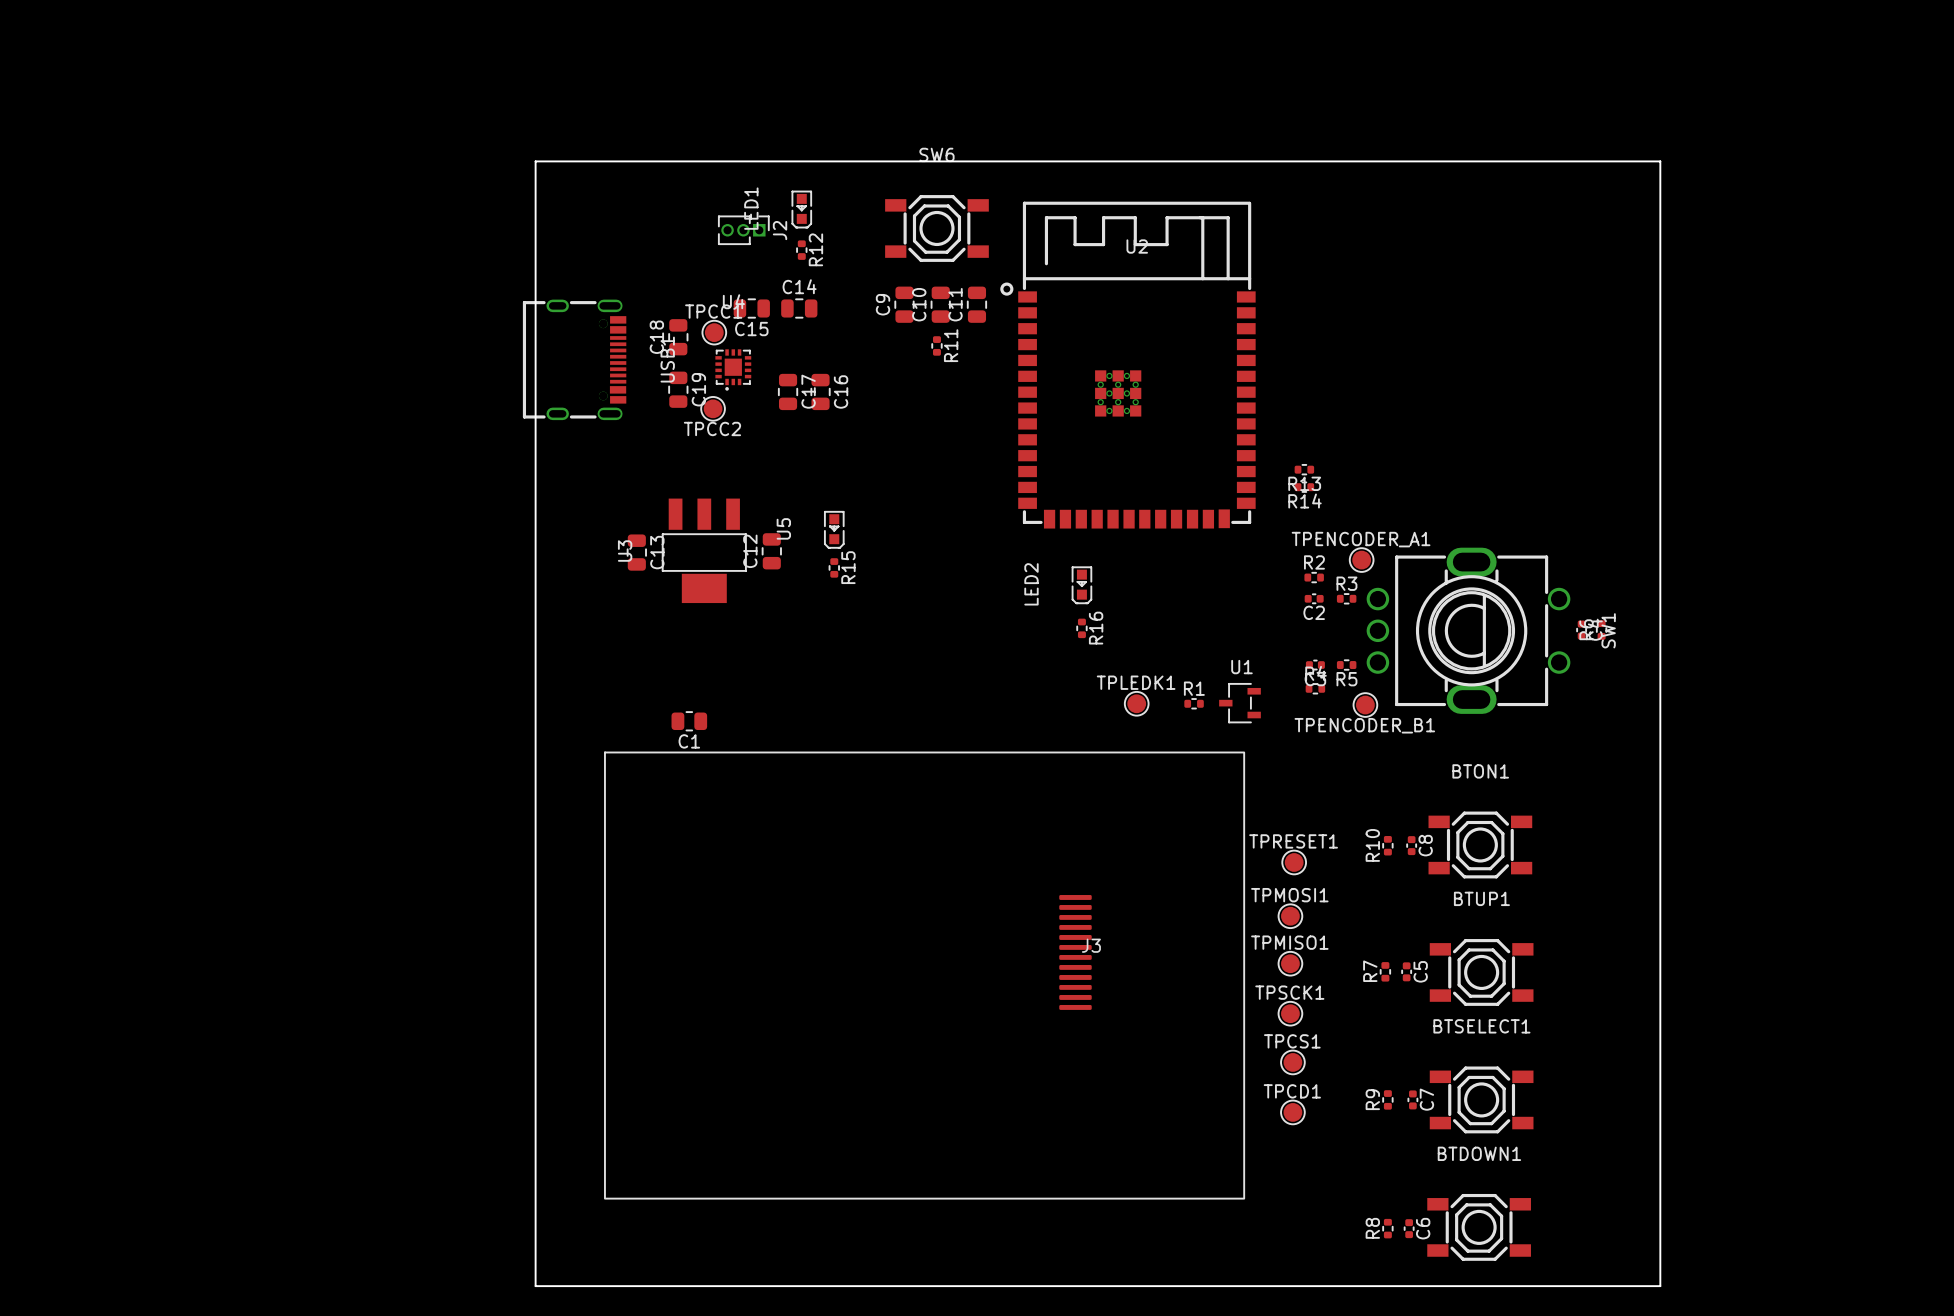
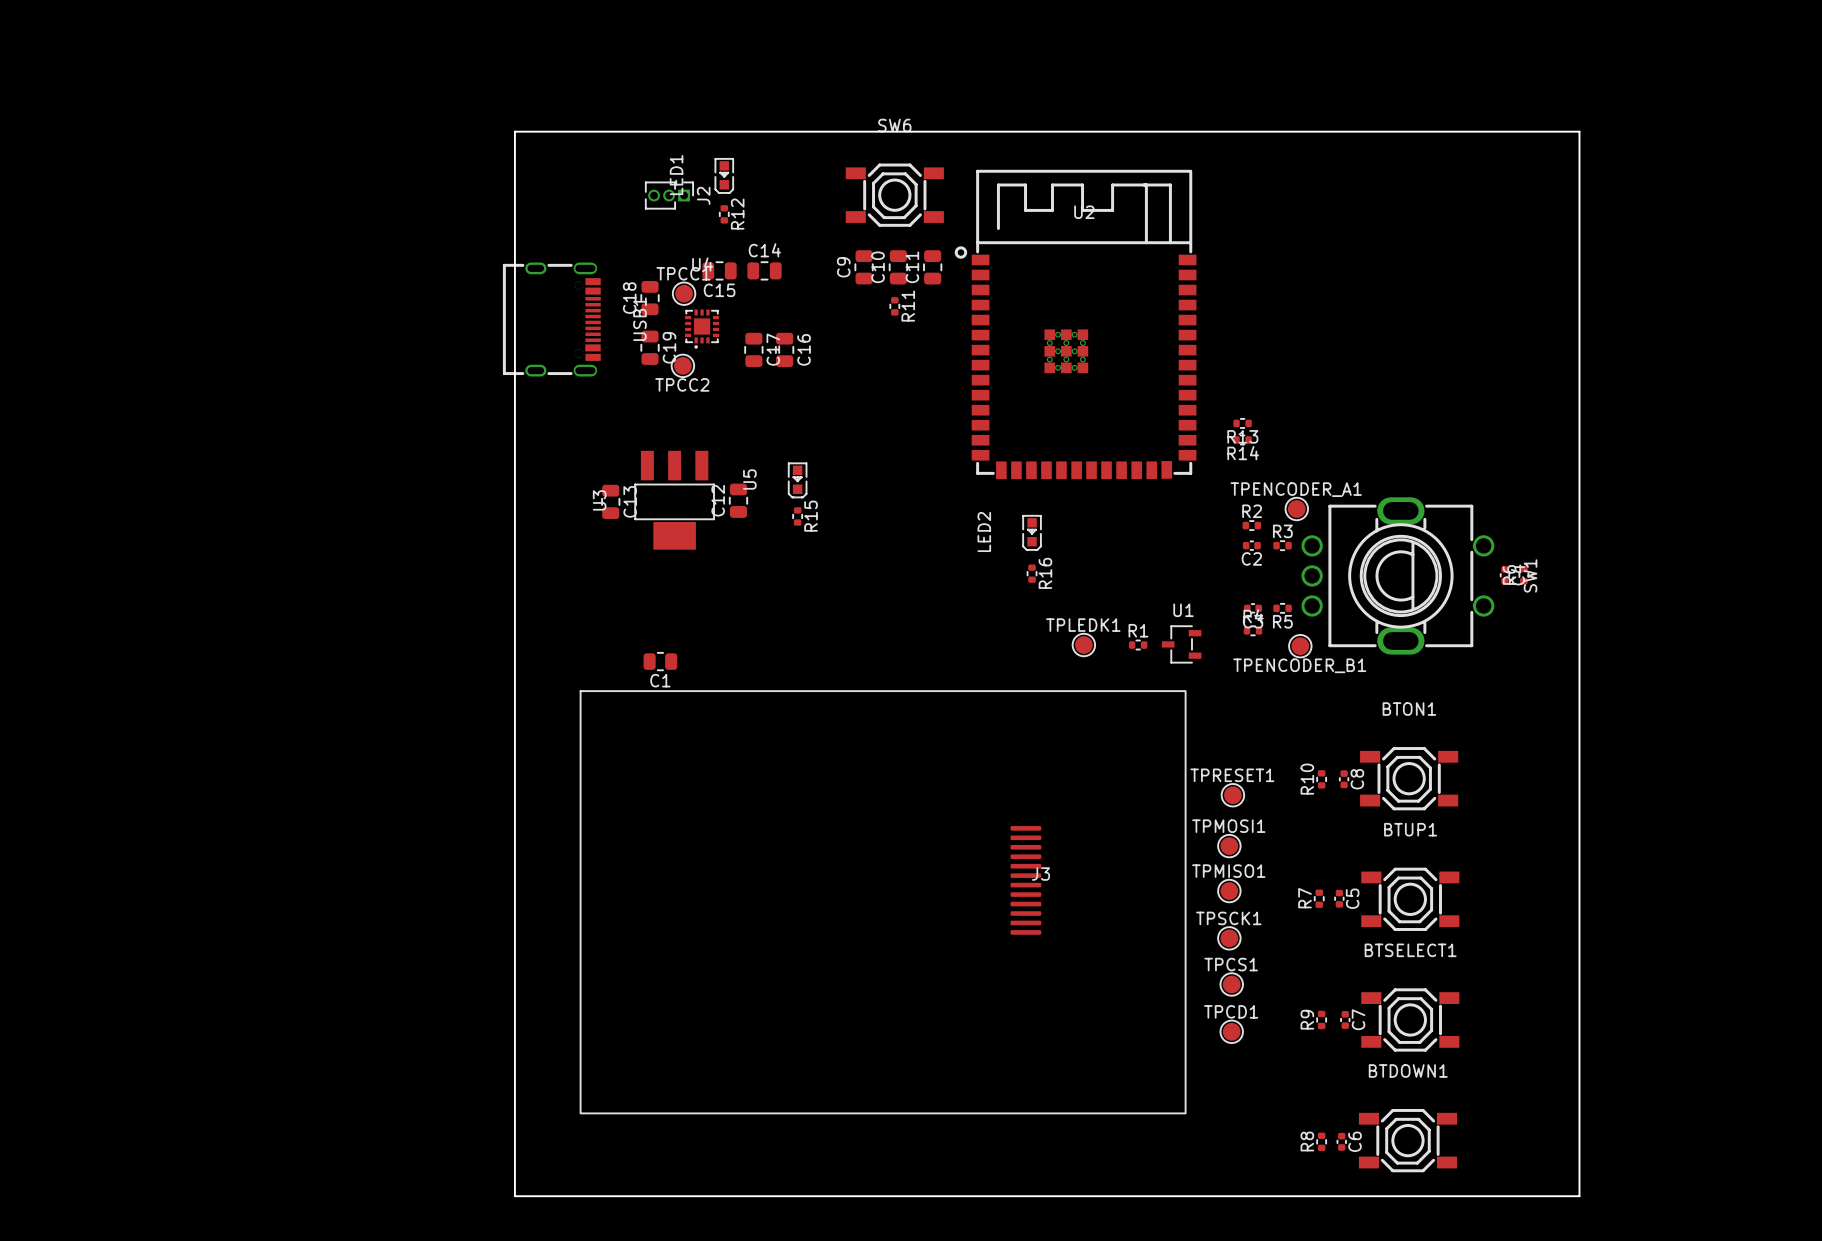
LED1 position: (801, 209) -> (724, 175)
J2 position: (743, 230) -> (669, 195)
R12 position: (801, 250) -> (724, 214)

